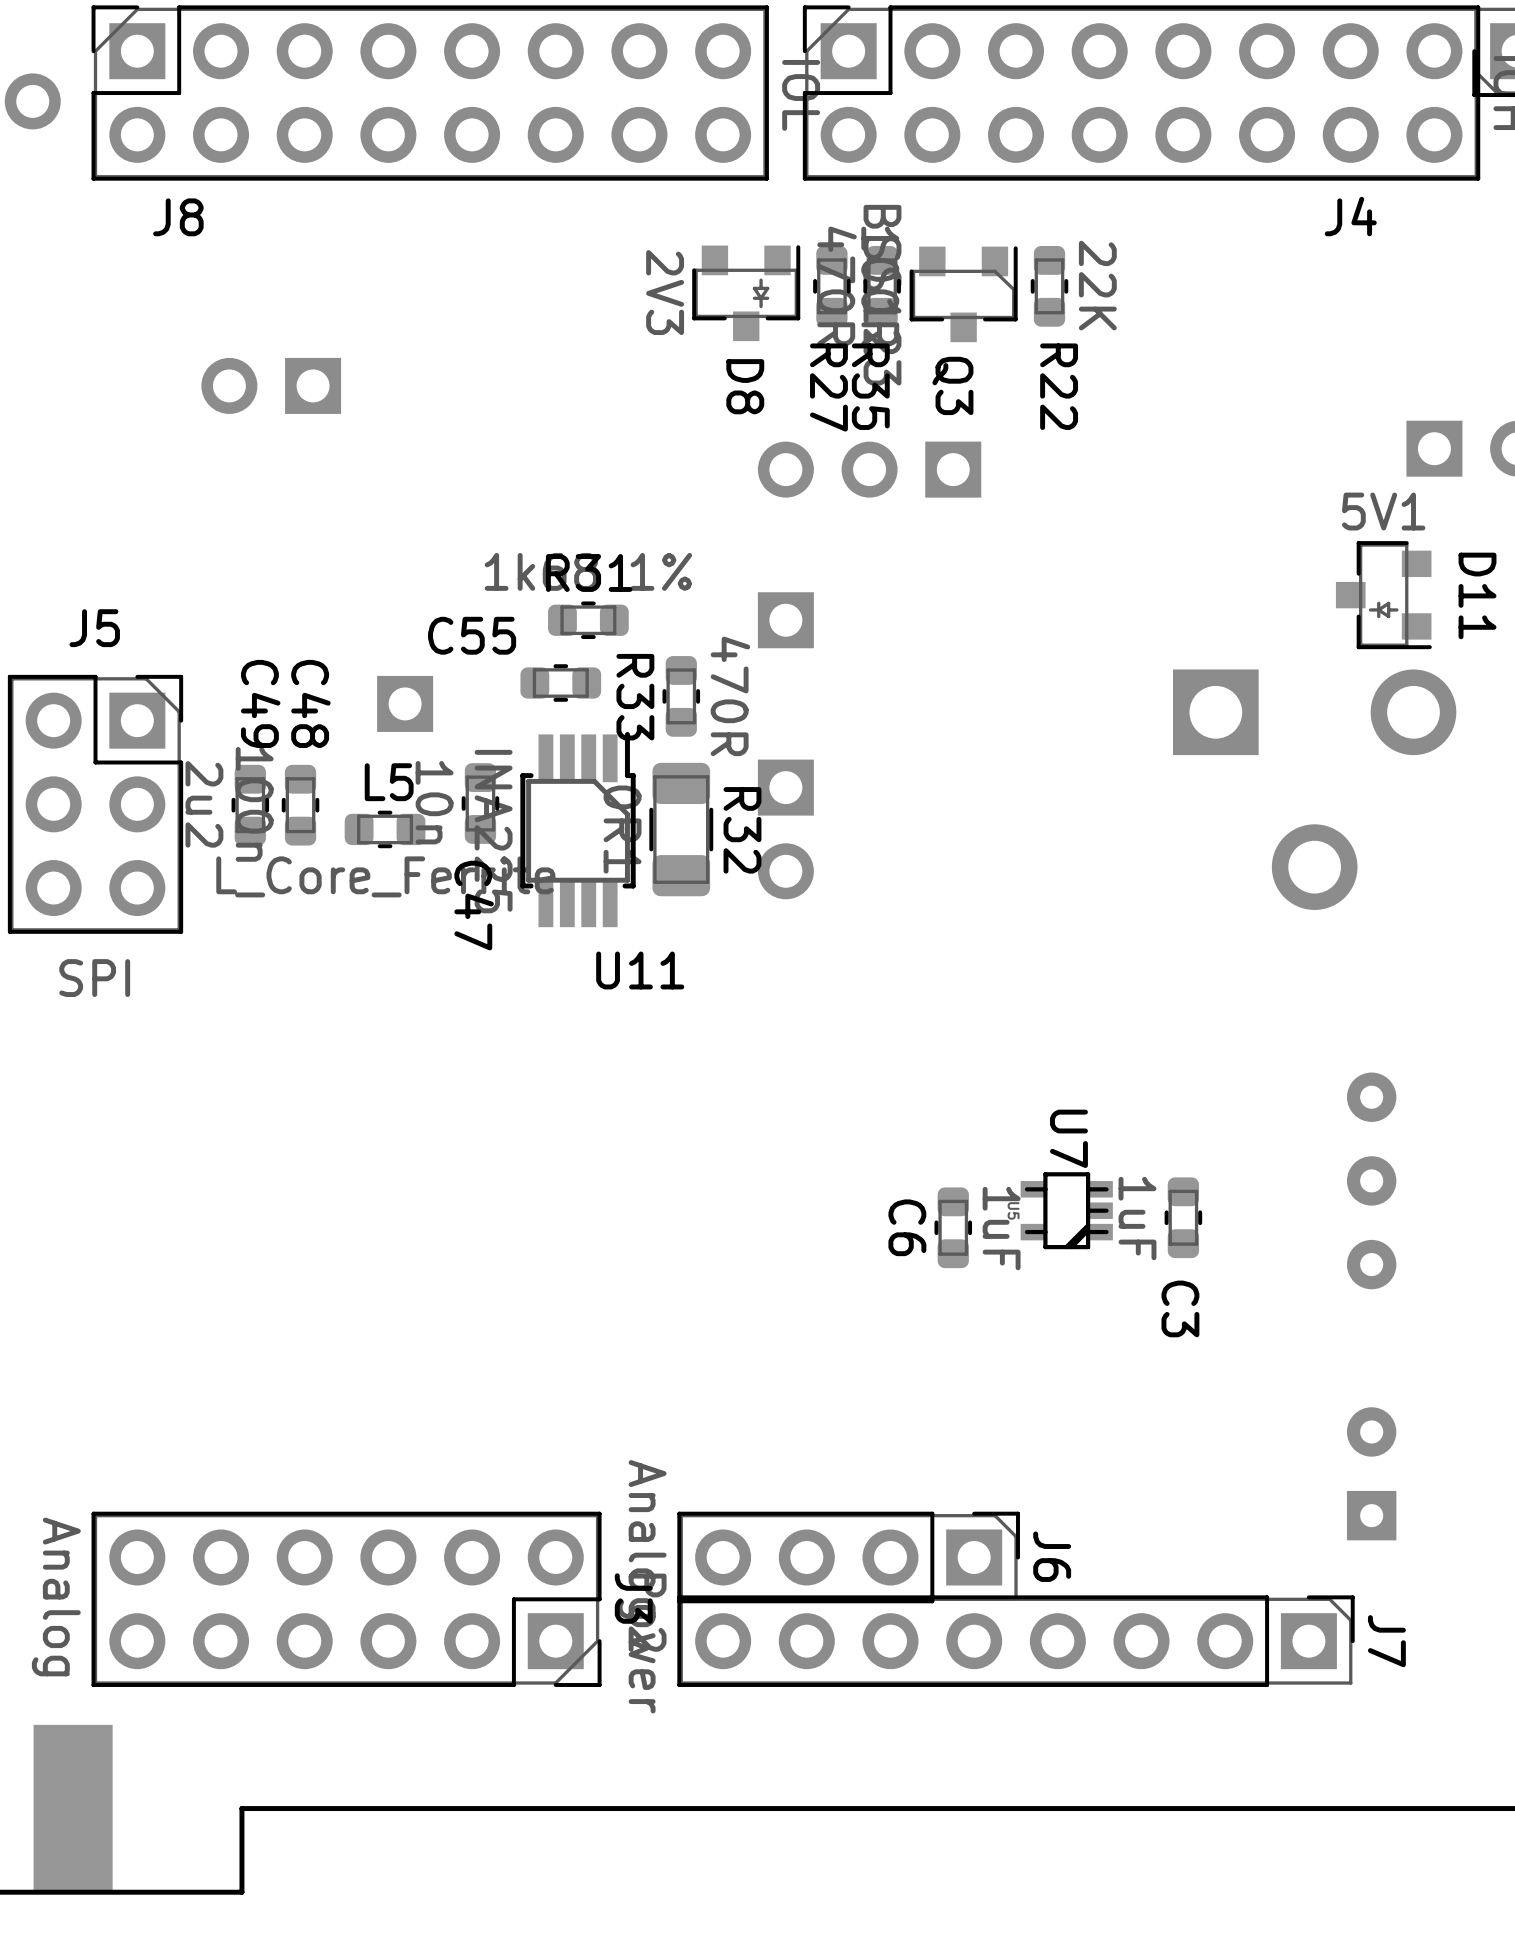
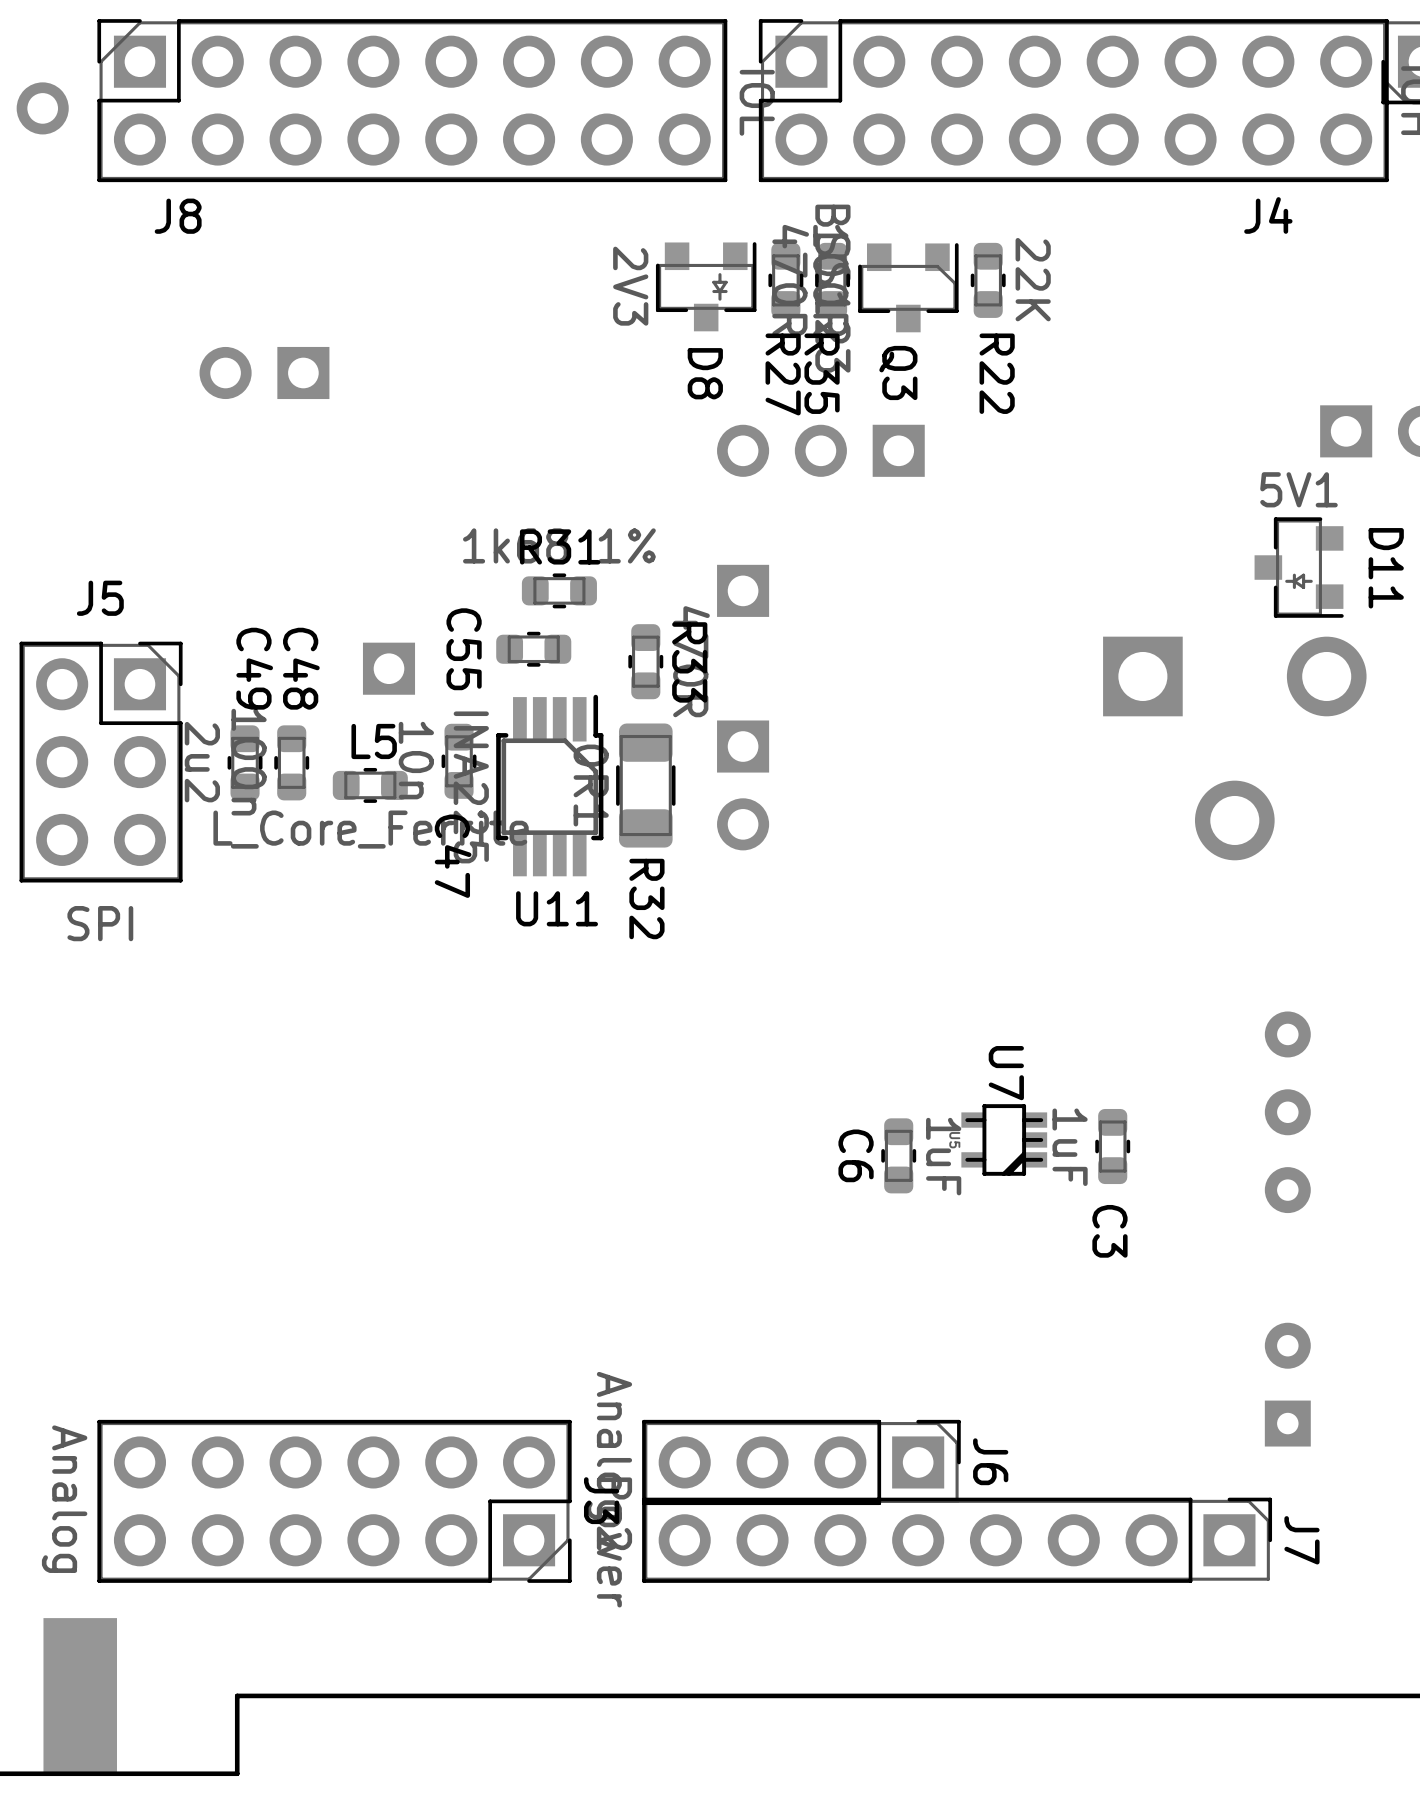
C55 name rotation: 0° (472, 635) -> 90° clockwise (464, 649)
R33 name position: R33 (635, 697) -> R33 (689, 662)
R32 name position: R32 (742, 830) -> R32 (646, 899)
U11 name position: U11 (640, 970) -> U11 (557, 908)

